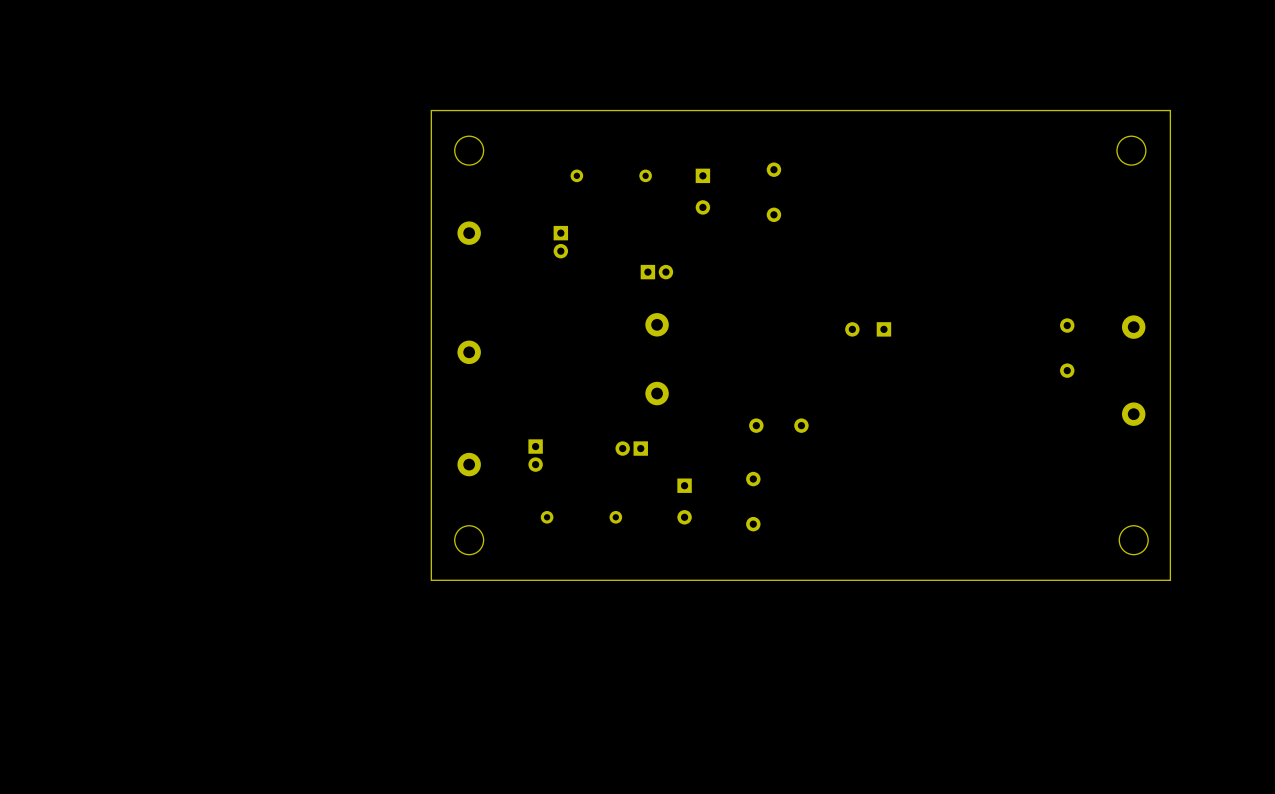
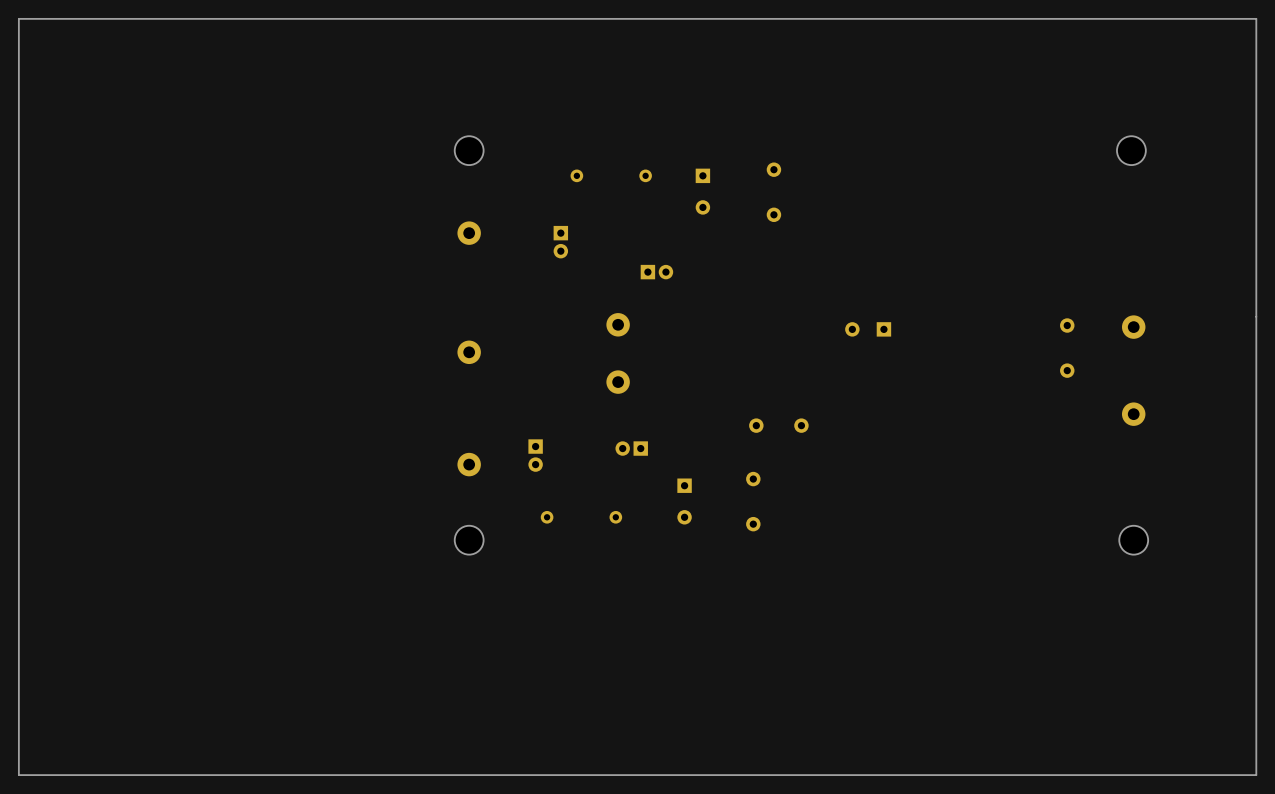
board edge: none -> (1256, 18) (1256, 775) (18, 775) (18, 18) (1256, 18)
board edge: (1170, 110) (431, 110) (431, 580) (1170, 580) (1170, 110) -> none
part: none -> (618, 324)
part: (657, 324) -> none
part: none -> (618, 382)
part: (657, 393) -> none

